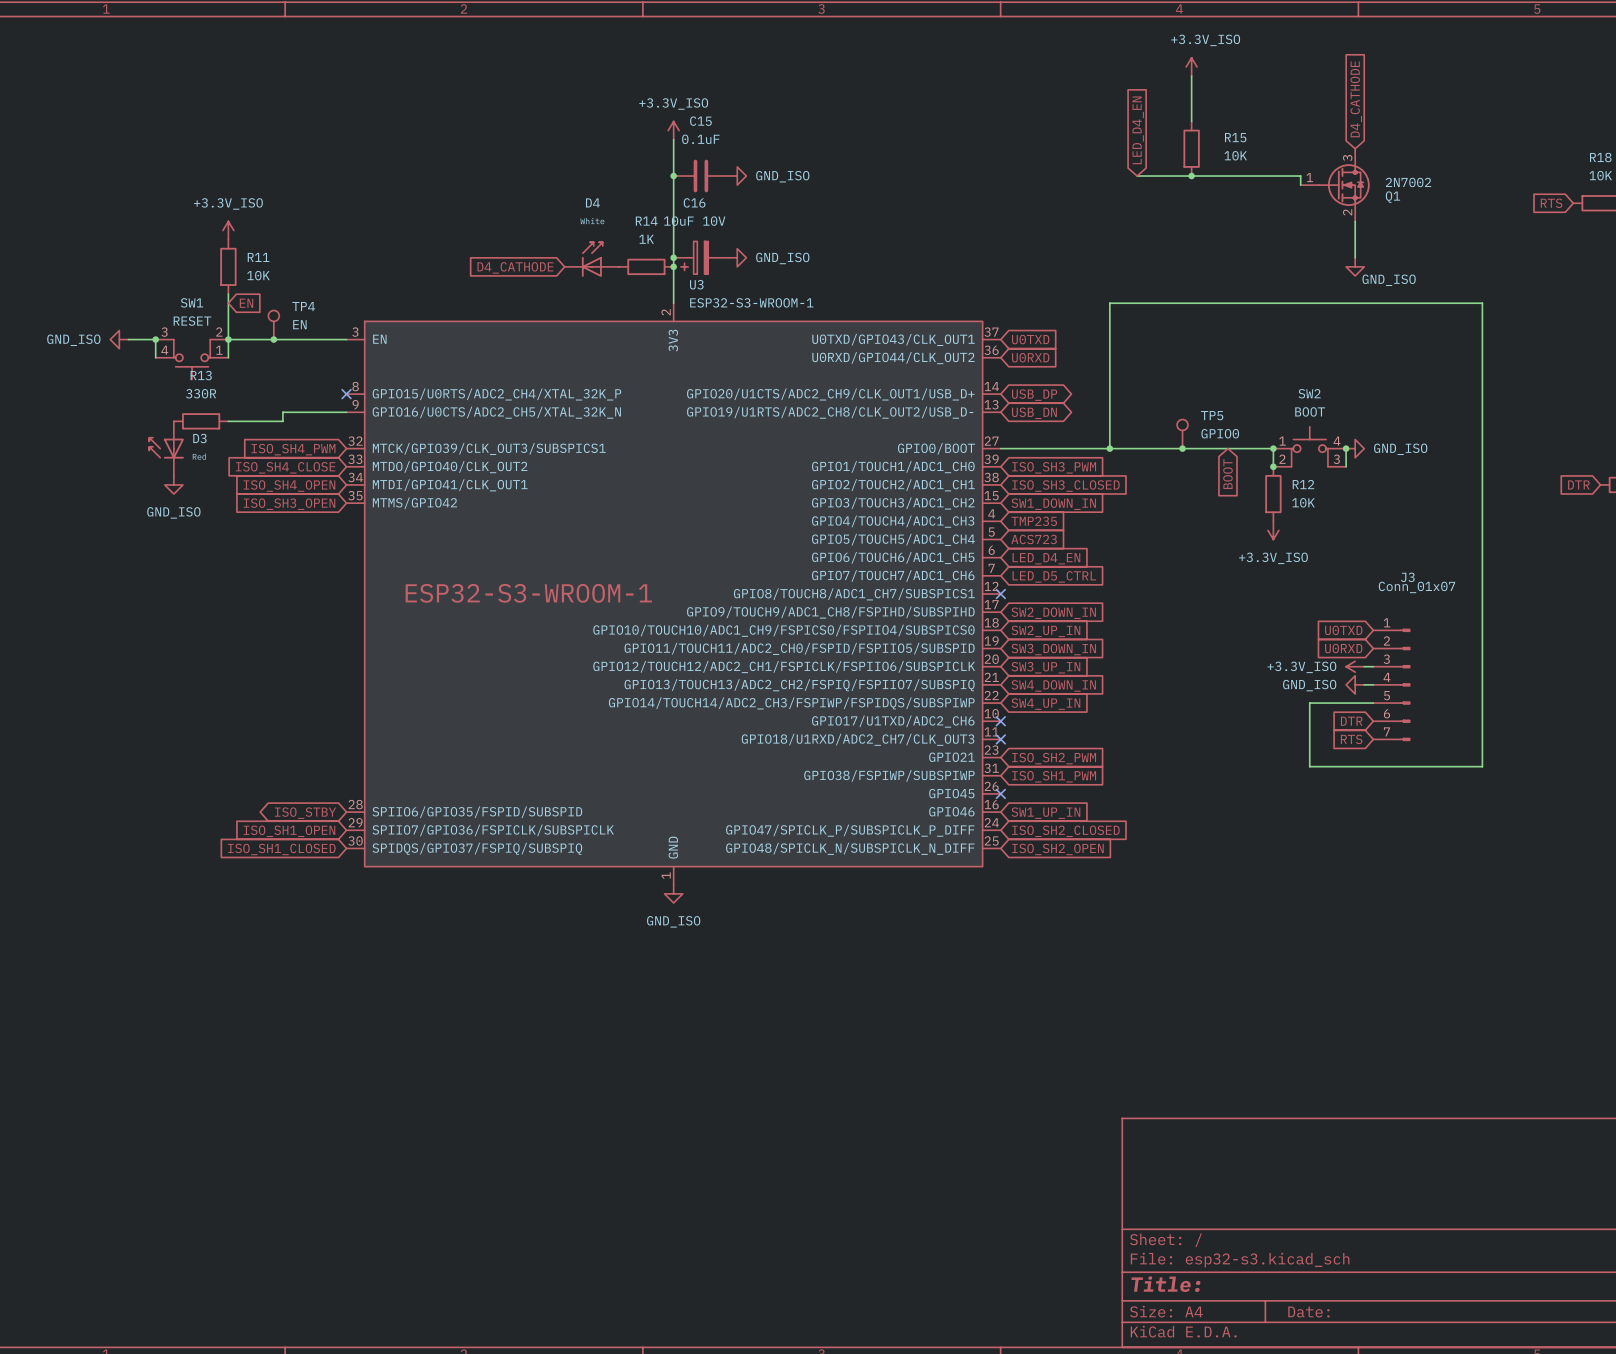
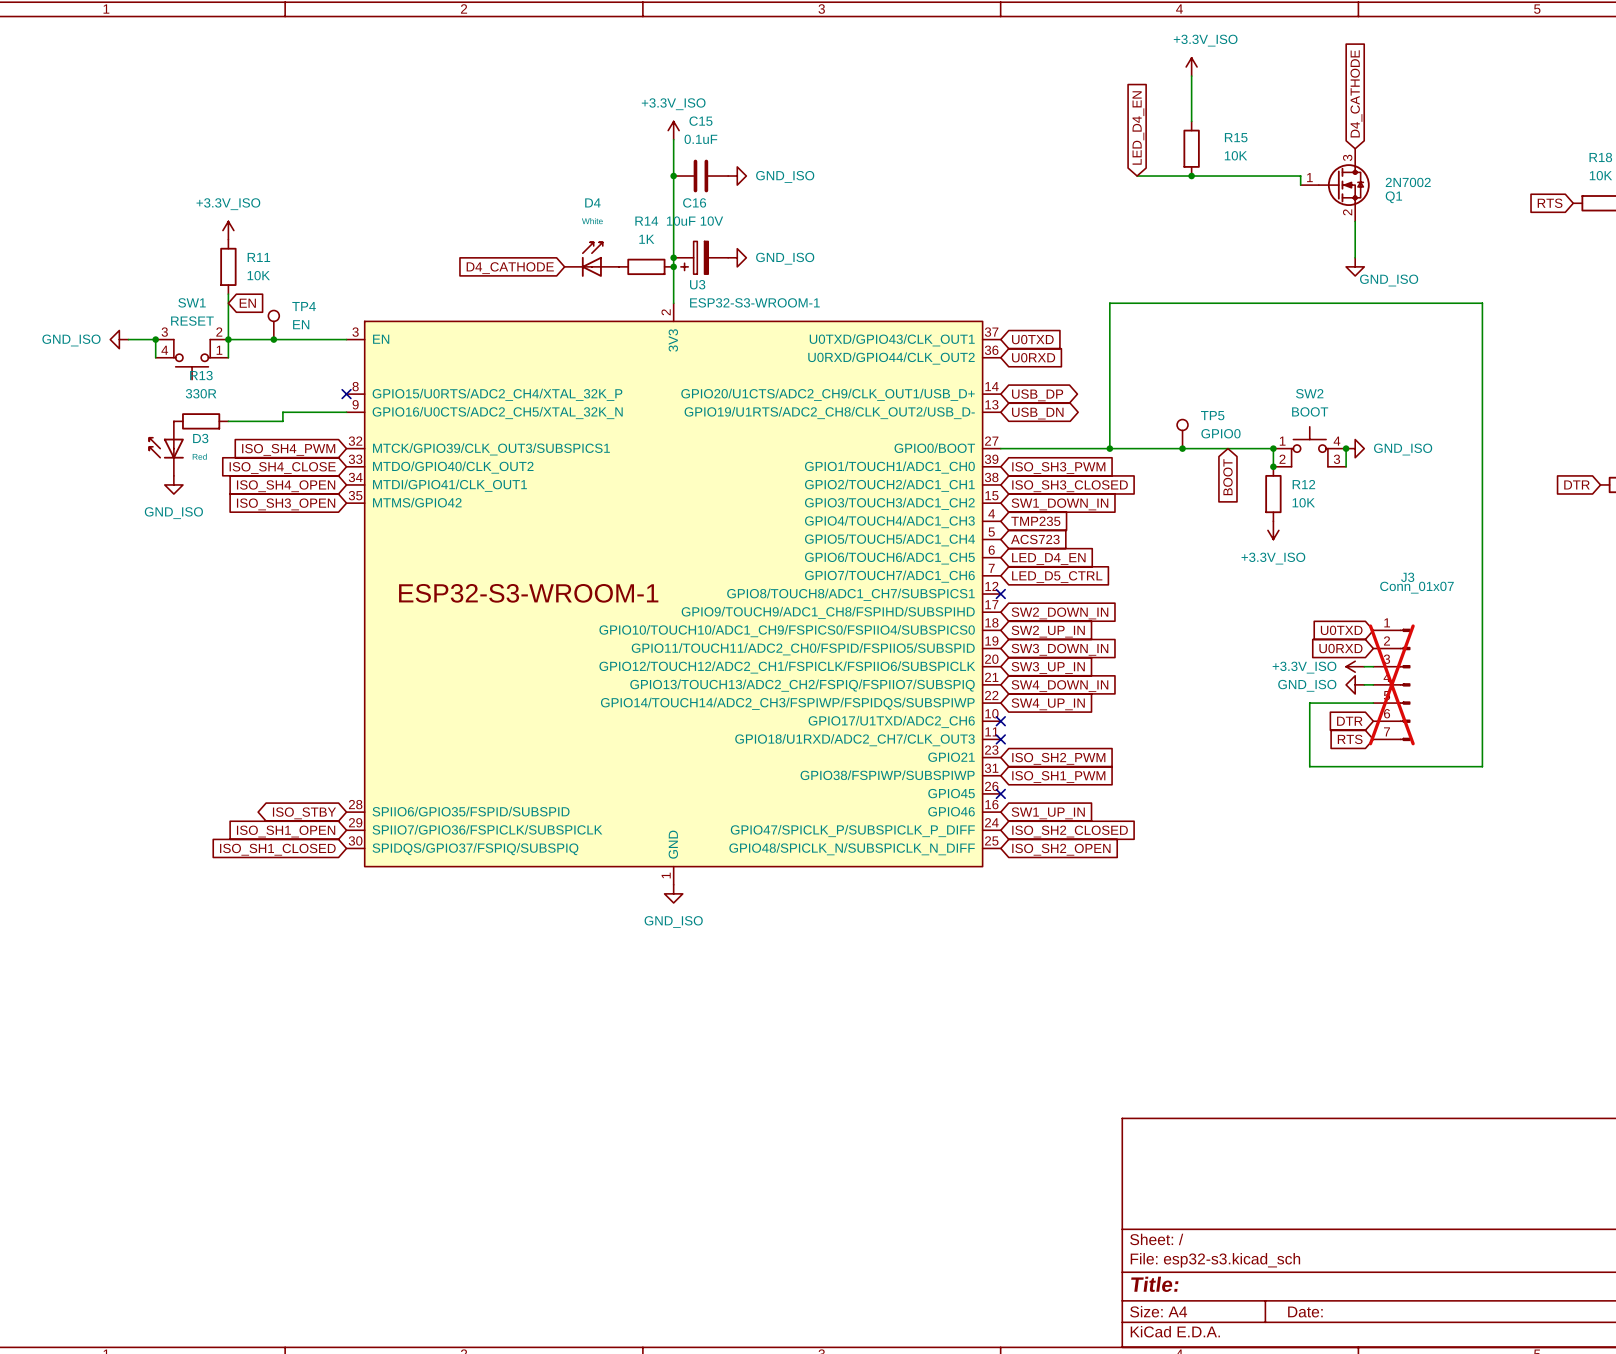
J3 do-not-place cross: none -> (1391, 684)

